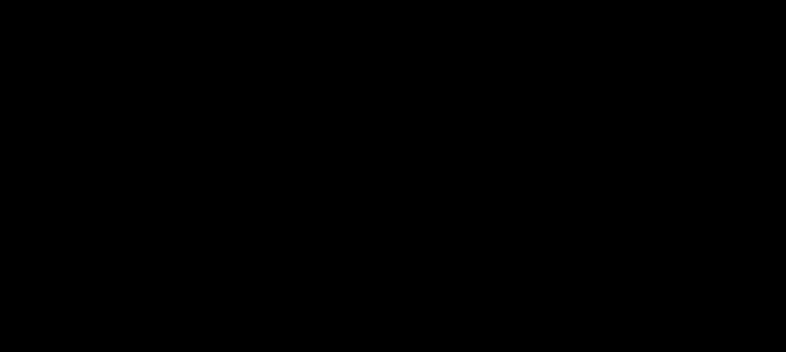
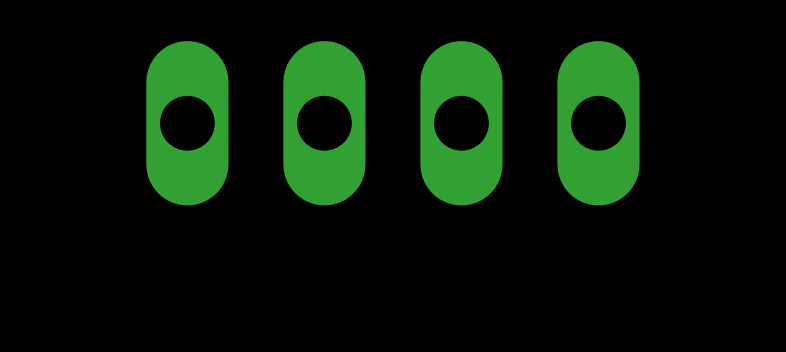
part: none -> (392, 123)

